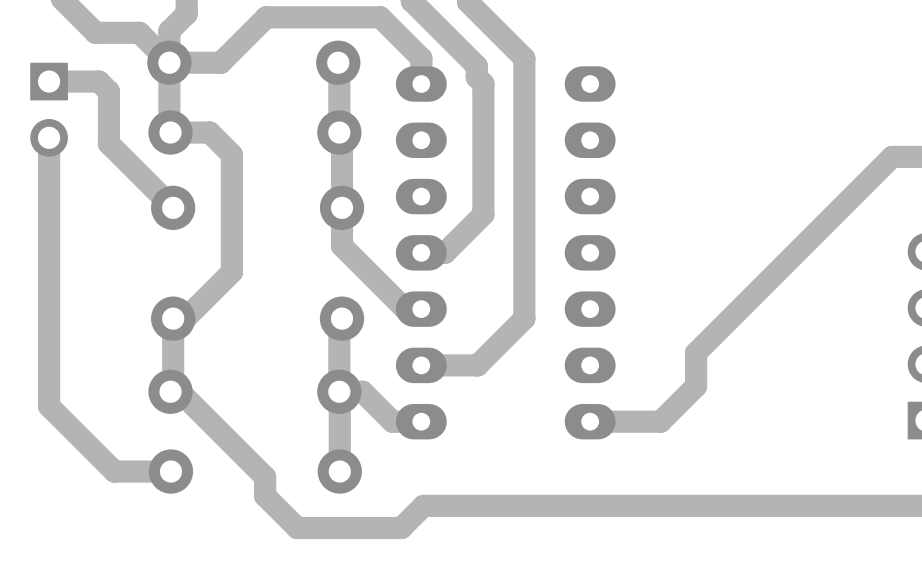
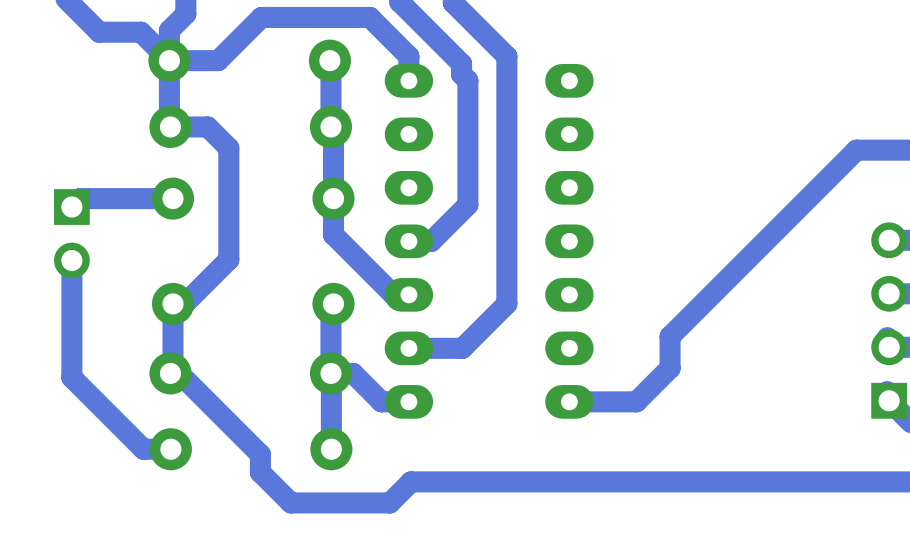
track: (49, 81) (98, 81) (108, 91) (108, 143) (173, 207) -> (71, 207) (80, 198) (172, 198)
part position: (49, 109) -> (71, 233)
track: (49, 137) (49, 406) (114, 471) (142, 471) -> (71, 260) (71, 377) (143, 449)

